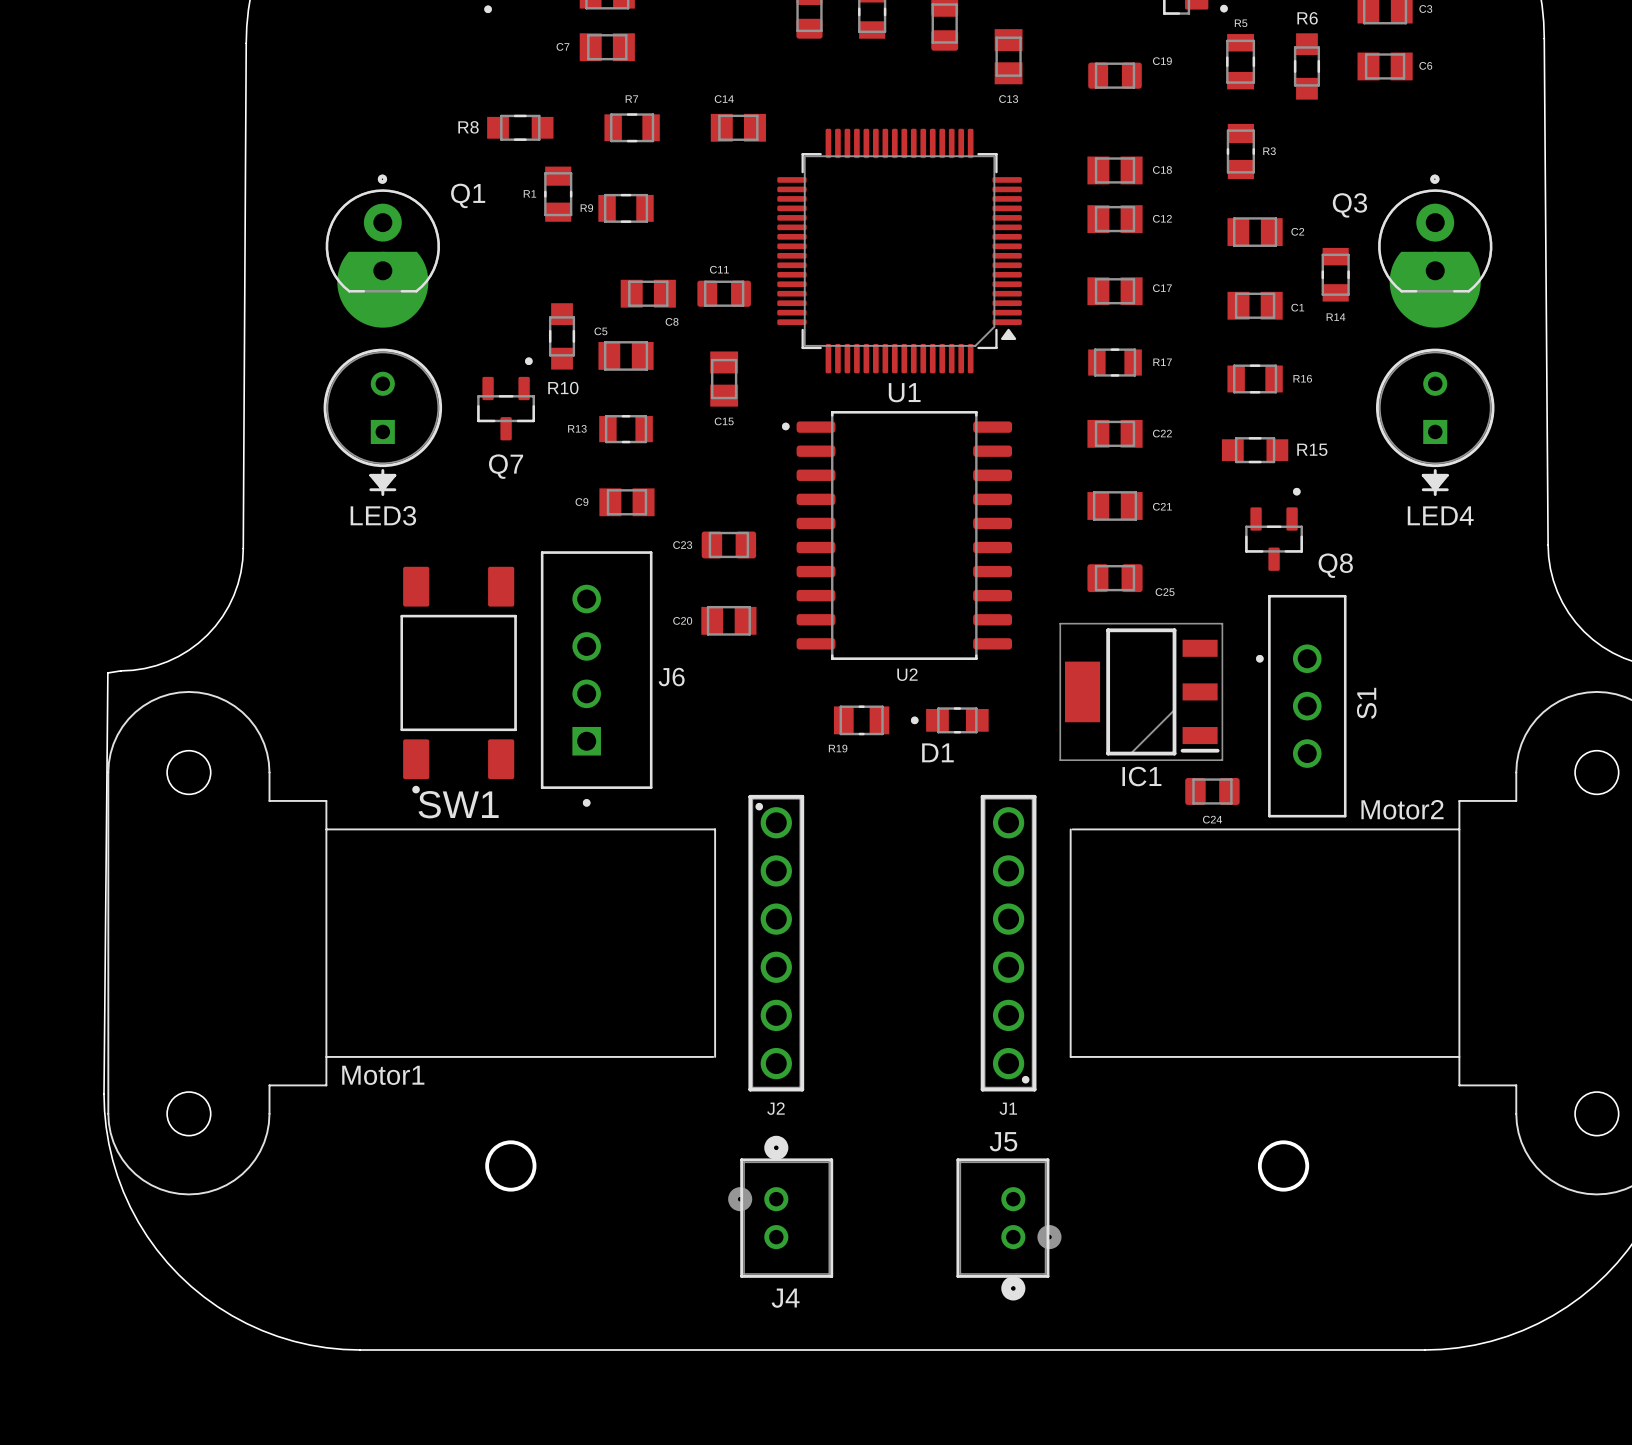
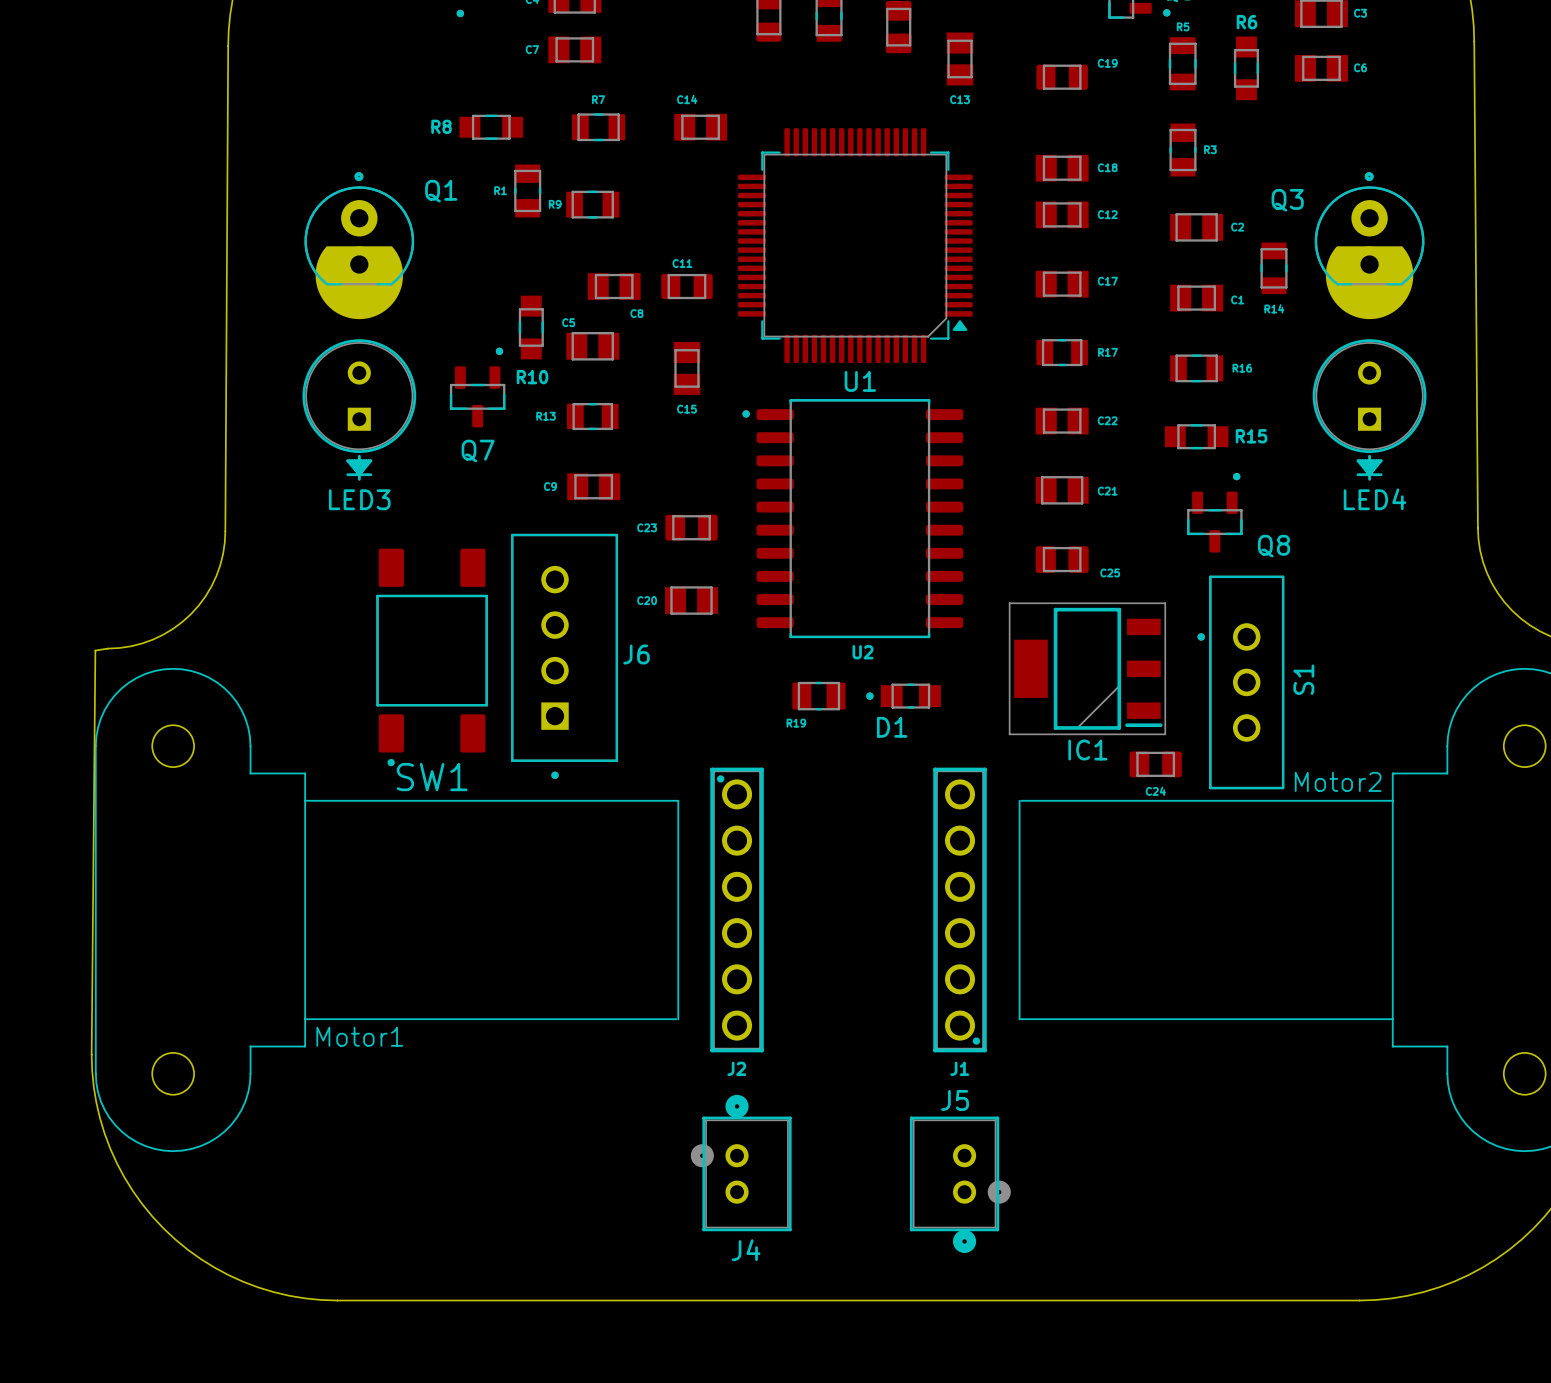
round board edge: [485, 1140, 537, 1192] -> none
round board edge: [1257, 1140, 1310, 1192] -> none

